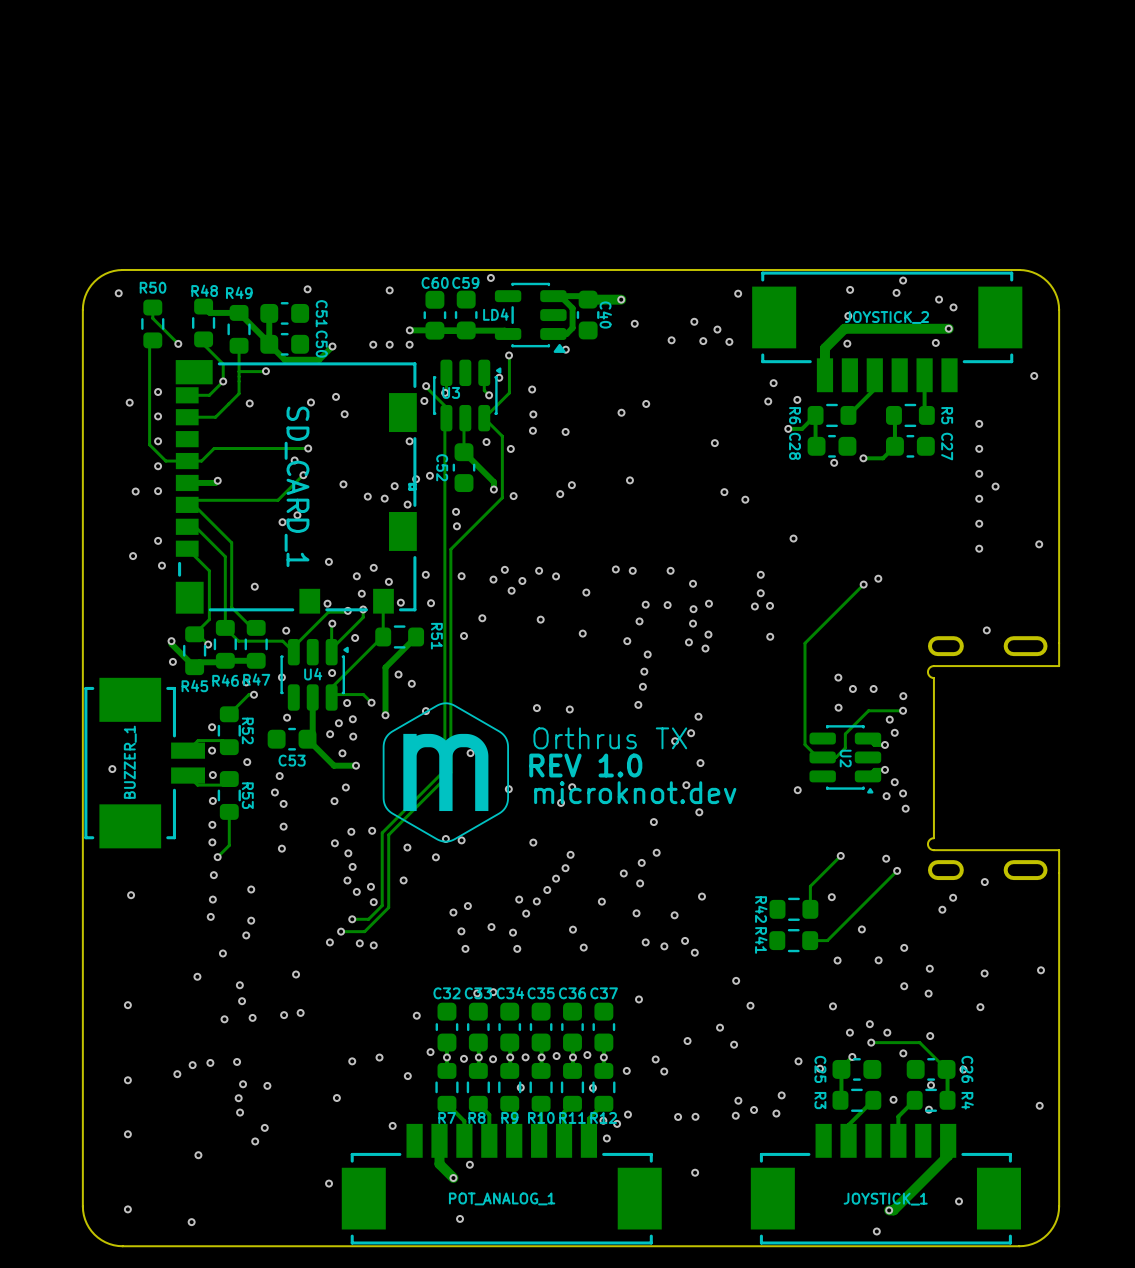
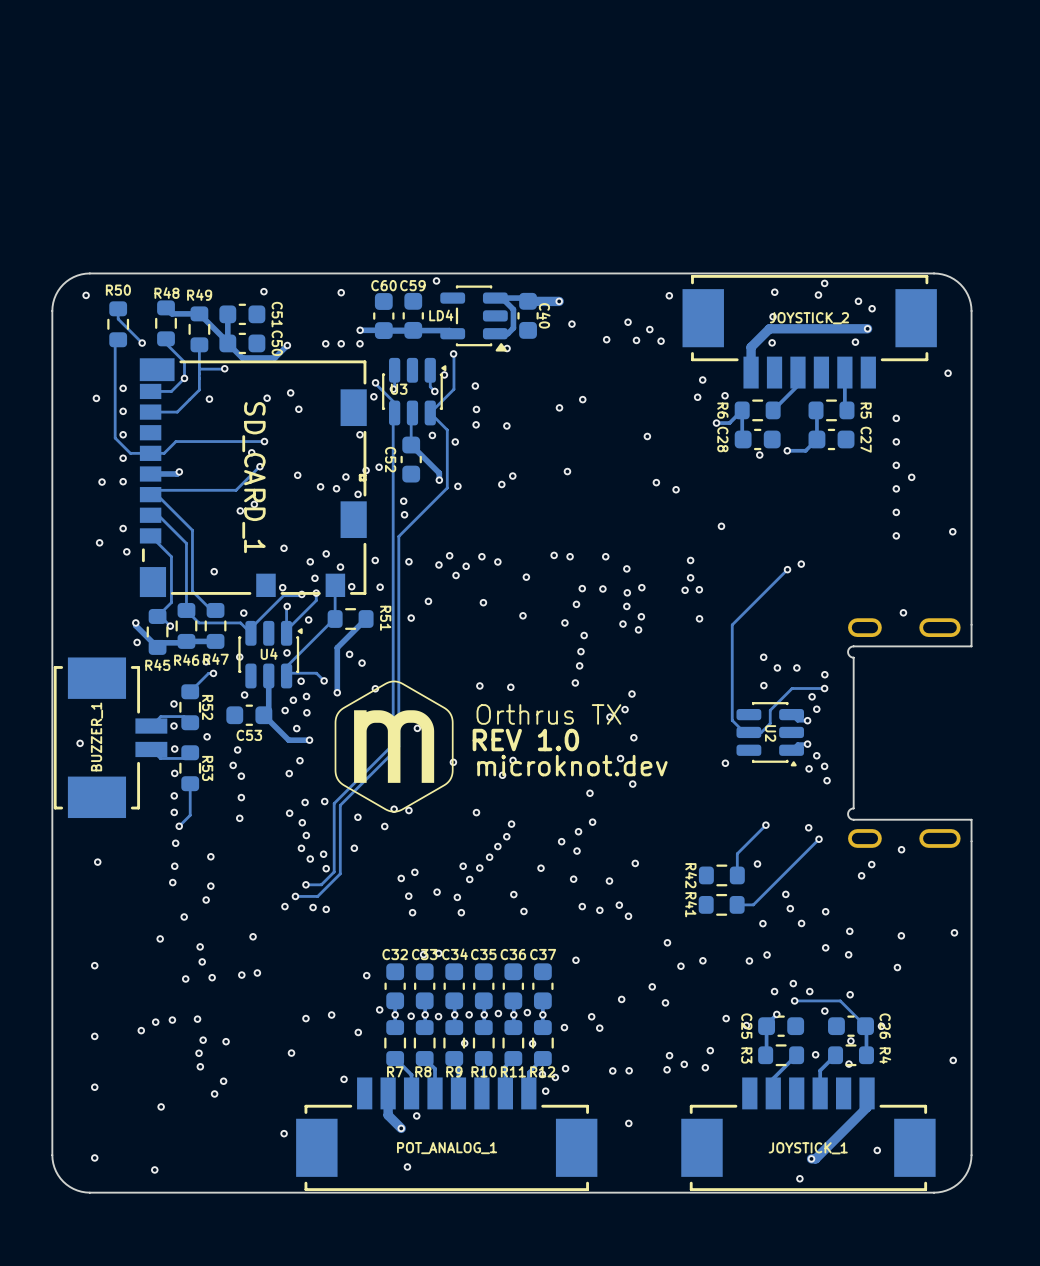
via: none -> (790, 908)
via: none -> (767, 954)
via: none -> (702, 960)
via: none -> (749, 960)
via: (832, 1006) -> none

